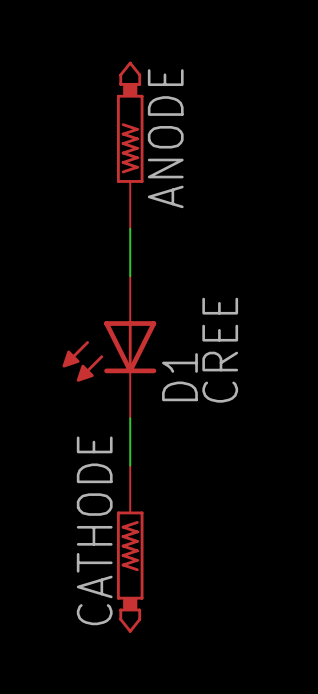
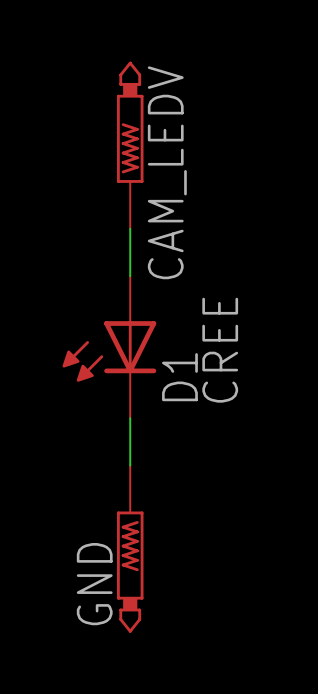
ANODE name: ANODE (165, 138) -> CAM_LEDV (167, 172)
CATHODE name: CATHODE (94, 530) -> GND (94, 584)

